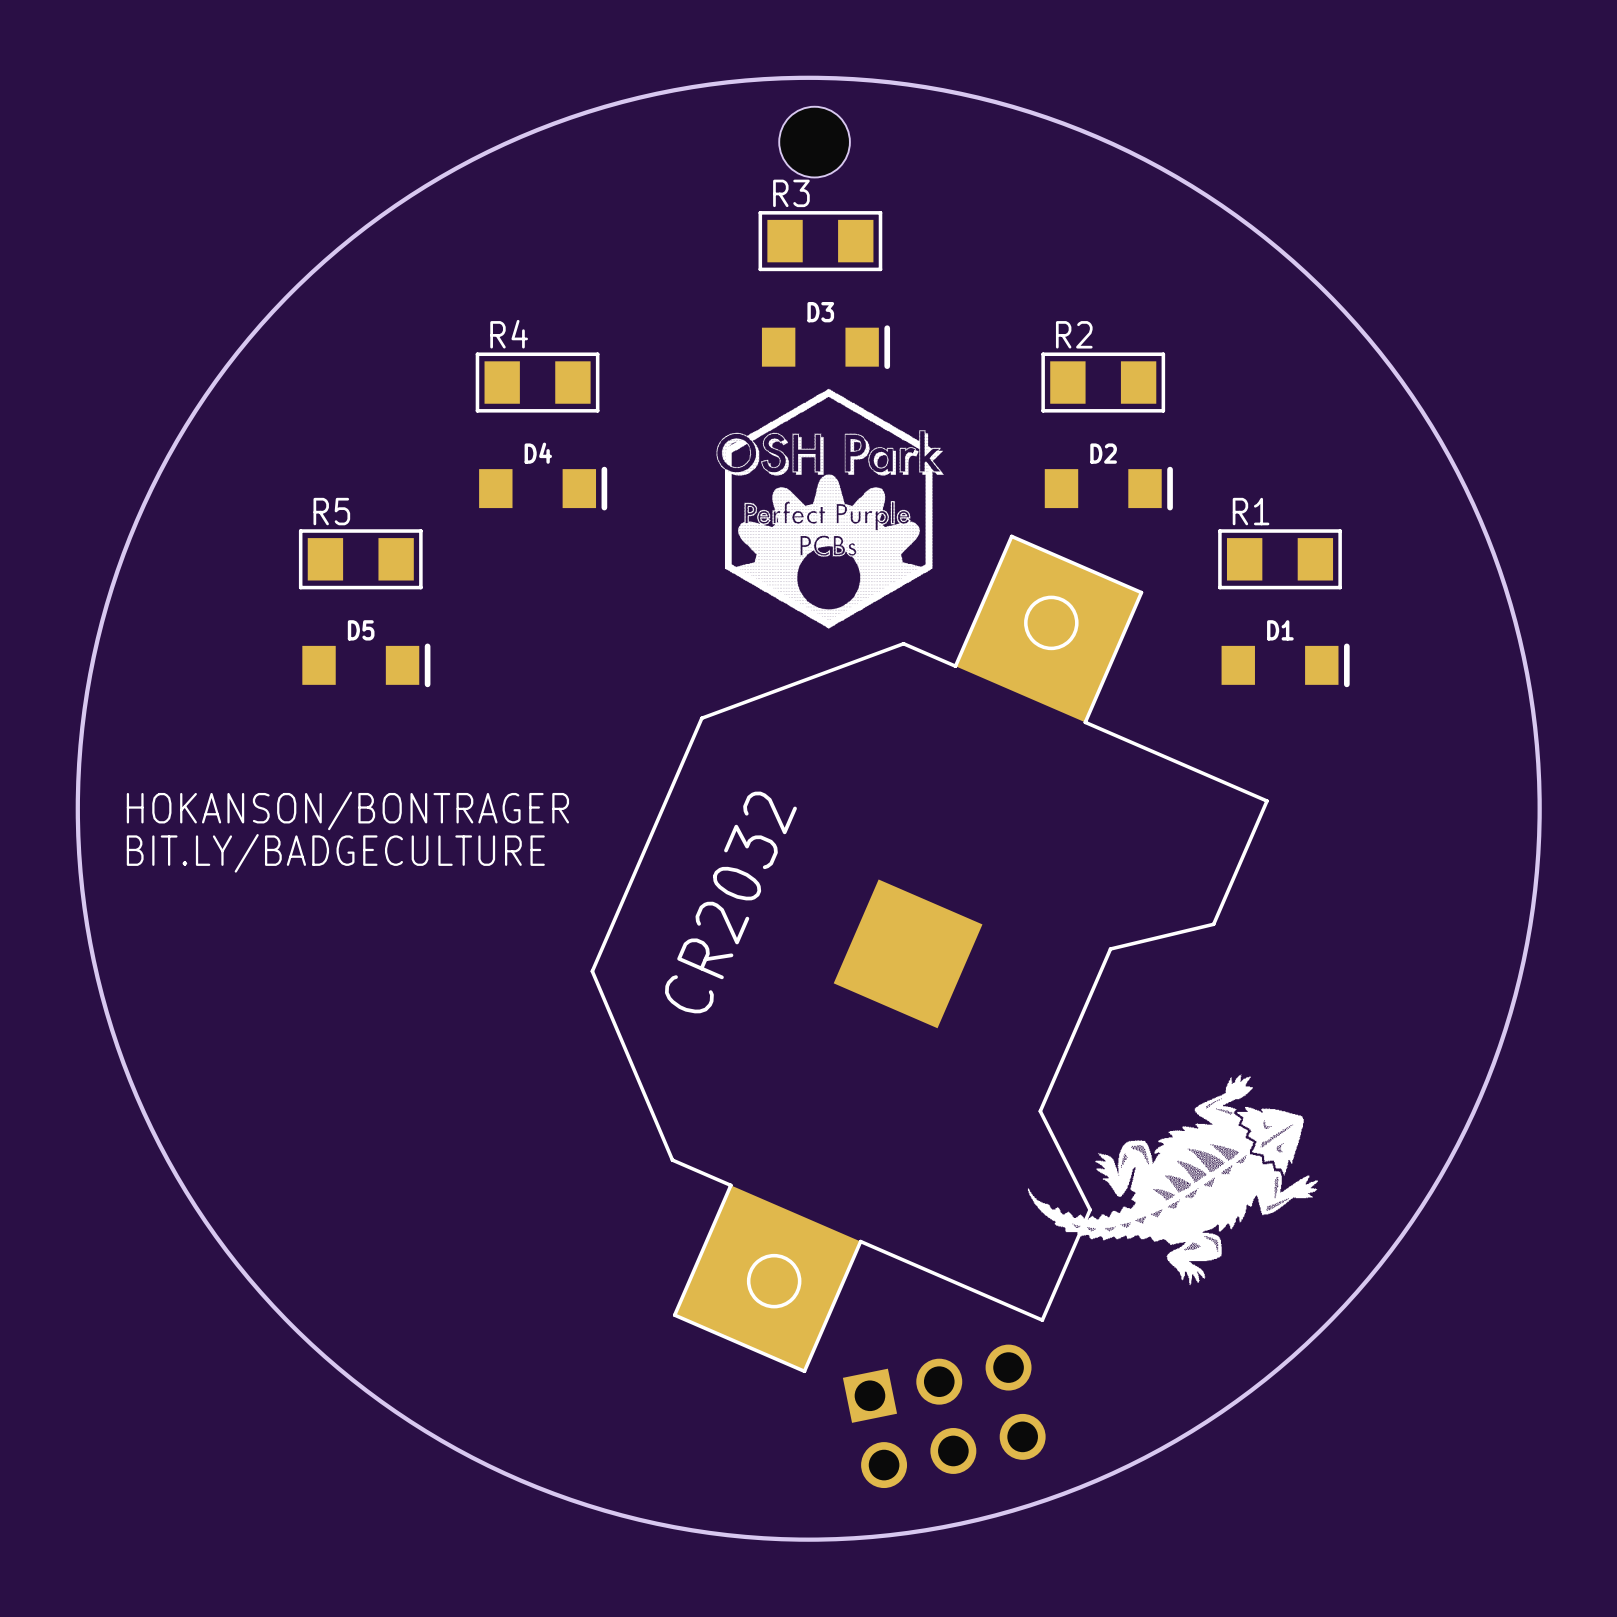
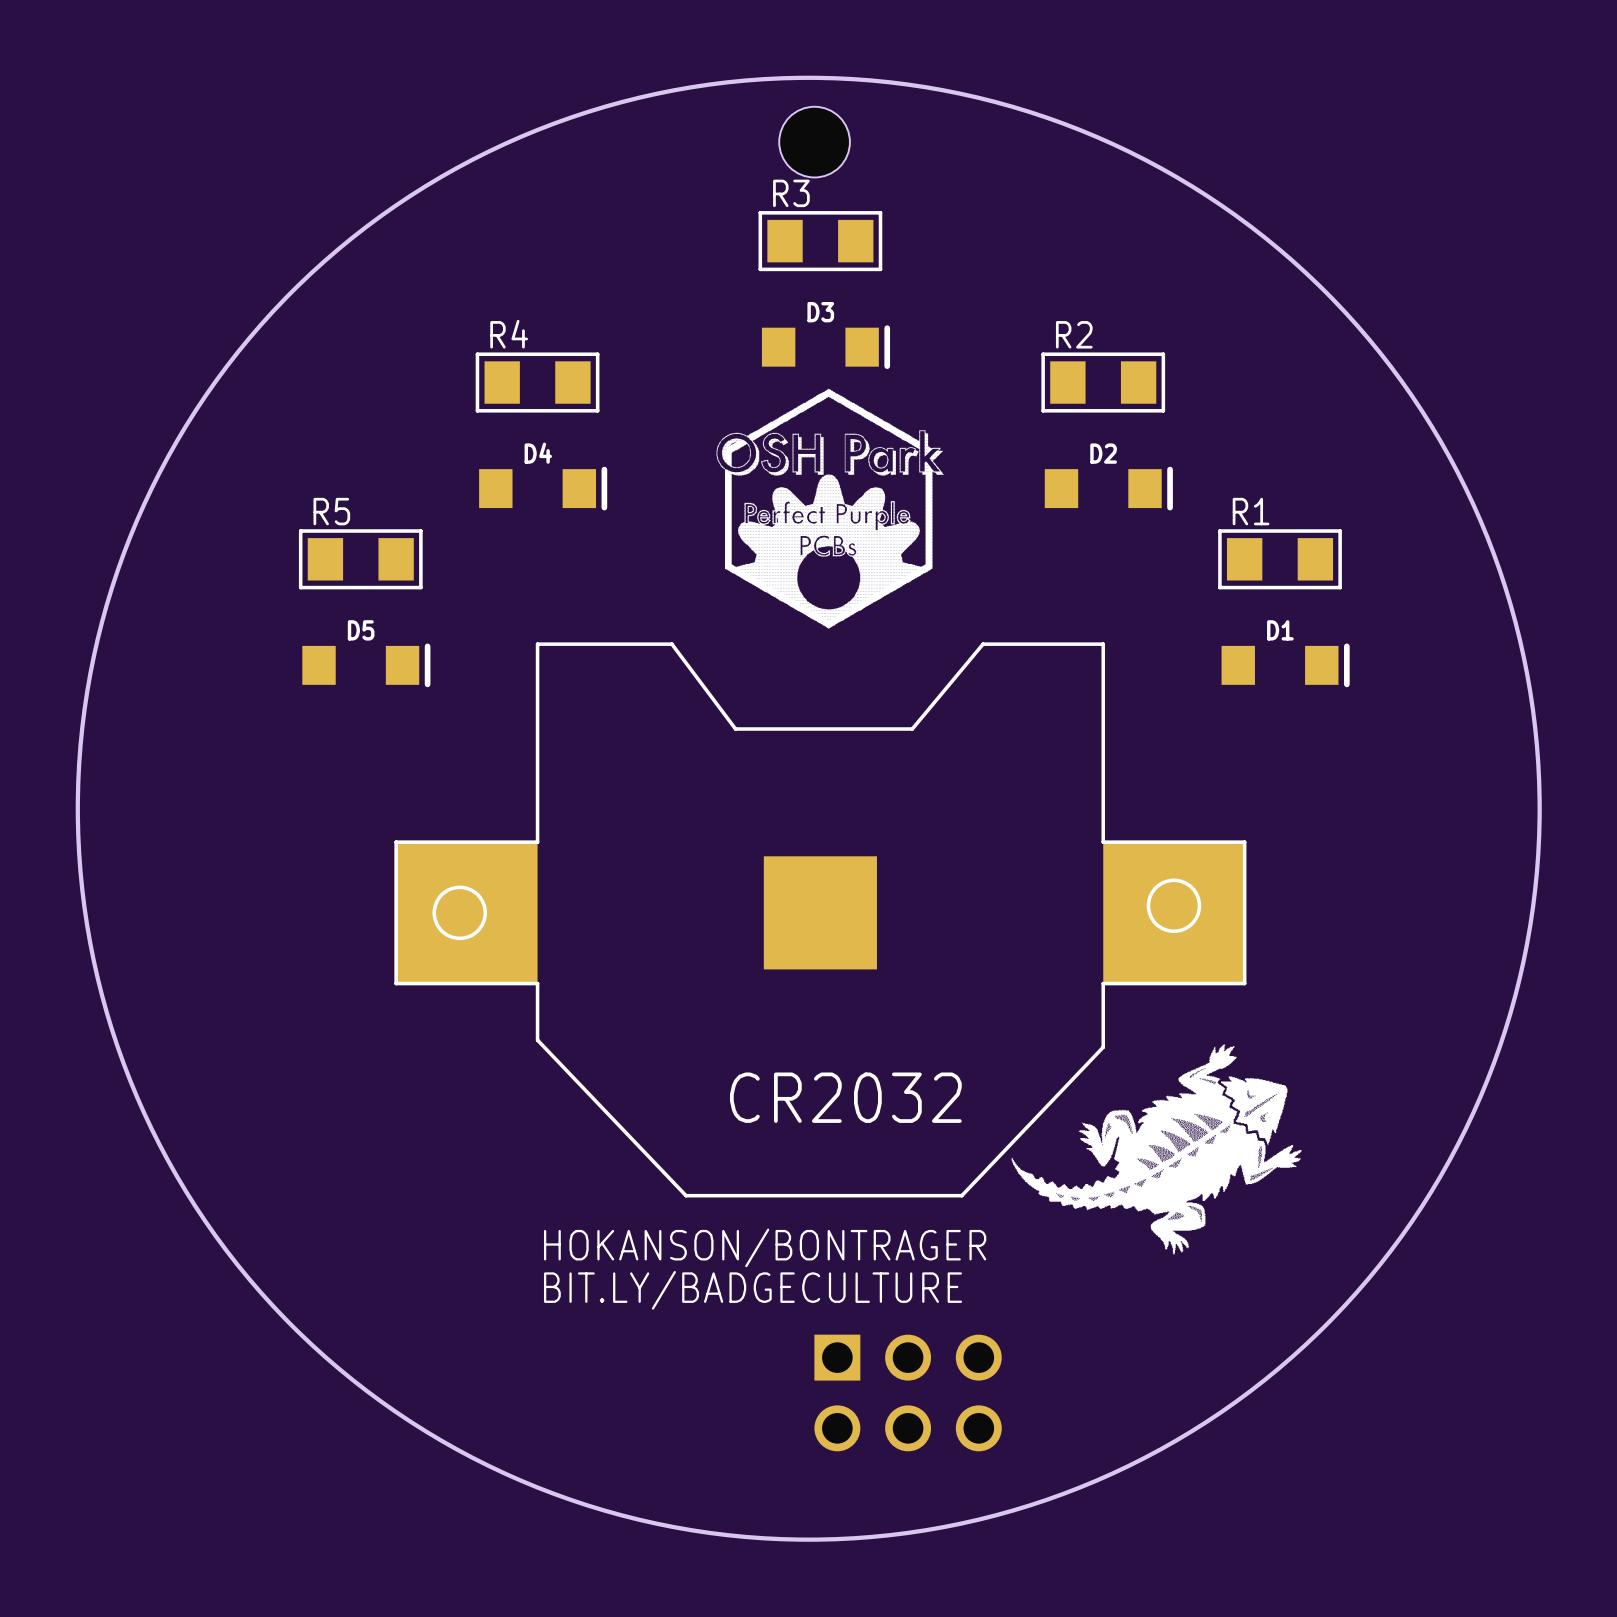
text position: HOKANSON/BONTRAGER (347, 810) -> HOKANSON/BONTRAGER (765, 1247)
text position: BIT.LY/BADGECULTURE (335, 853) -> BIT.LY/BADGECULTURE (753, 1290)
CR2032 rotation: 0° (929, 953) -> 113.4° counterclockwise (820, 919)
drawing position: (1172, 1179) -> (1156, 1149)
part: none -> (908, 1392)
part: (944, 1416) -> none

